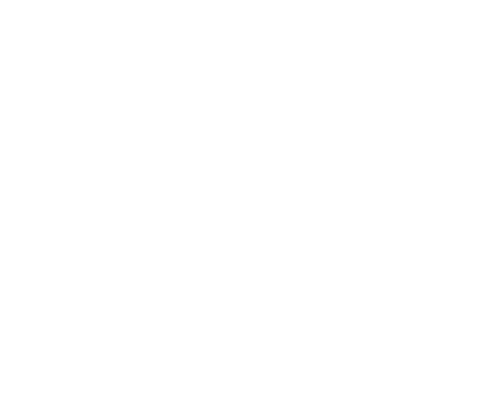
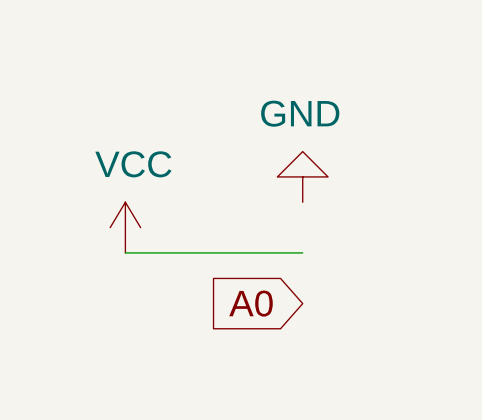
power symbol: none -> GND (302, 176)
power symbol: none -> VCC (125, 227)
wire: none -> (125, 252) (302, 252)
global label: none -> A0 (251, 303)

